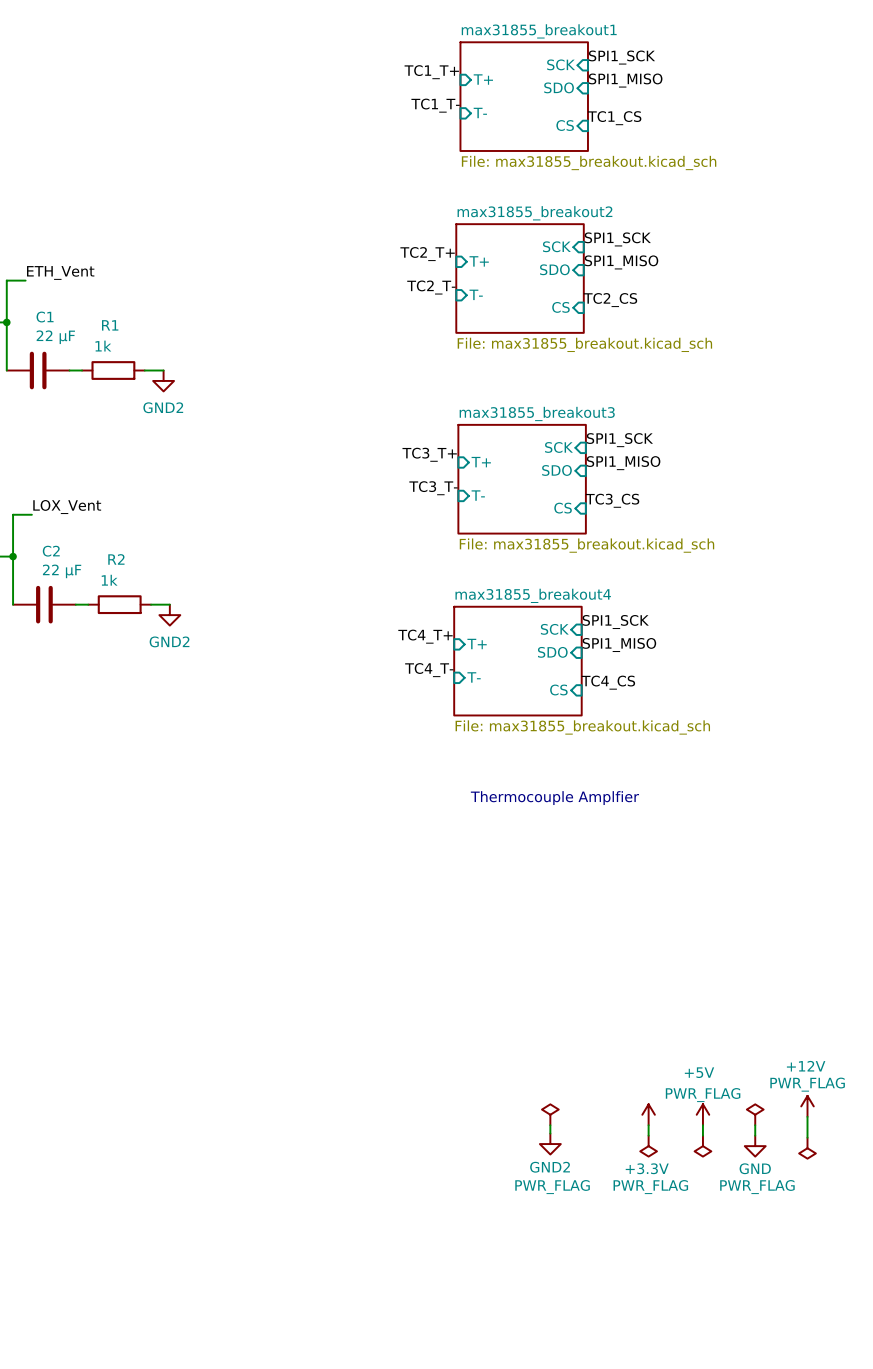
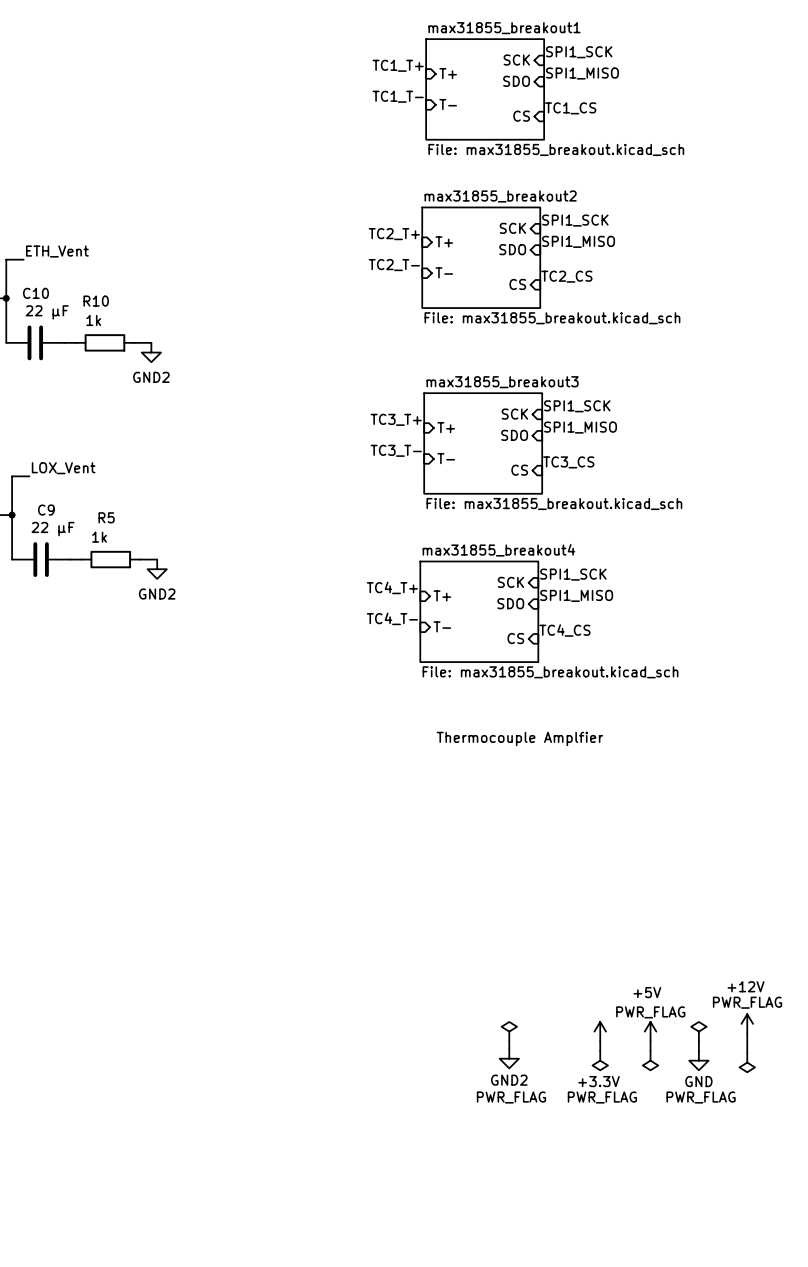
C1 name: C1 (45, 317) -> C10 (35, 293)
R1 name: R1 (110, 325) -> R10 (96, 301)
C2 name: C2 (51, 551) -> C9 (46, 510)
R2 name: R2 (116, 559) -> R5 (106, 517)

